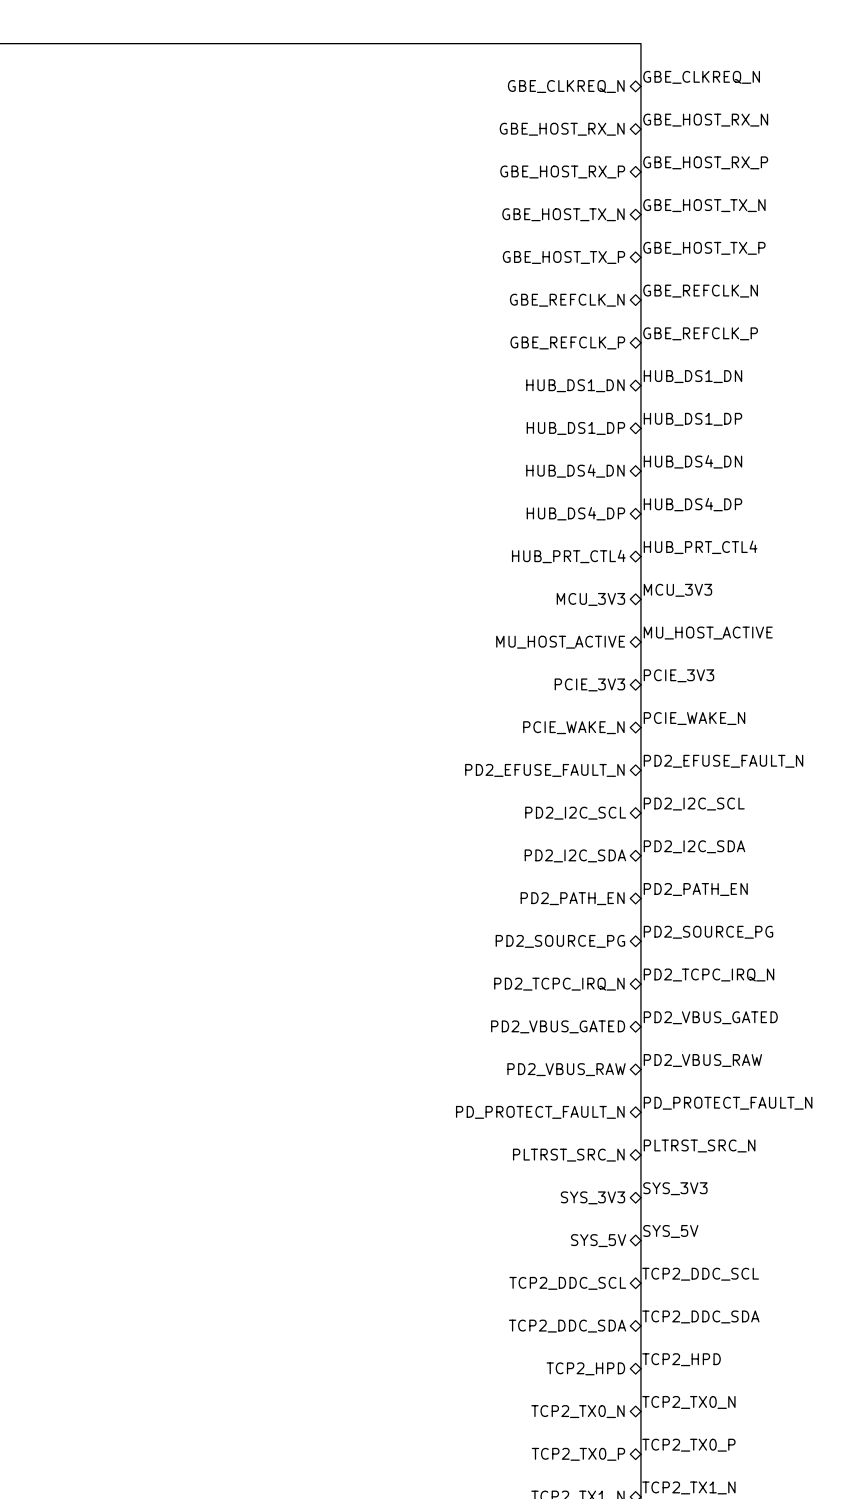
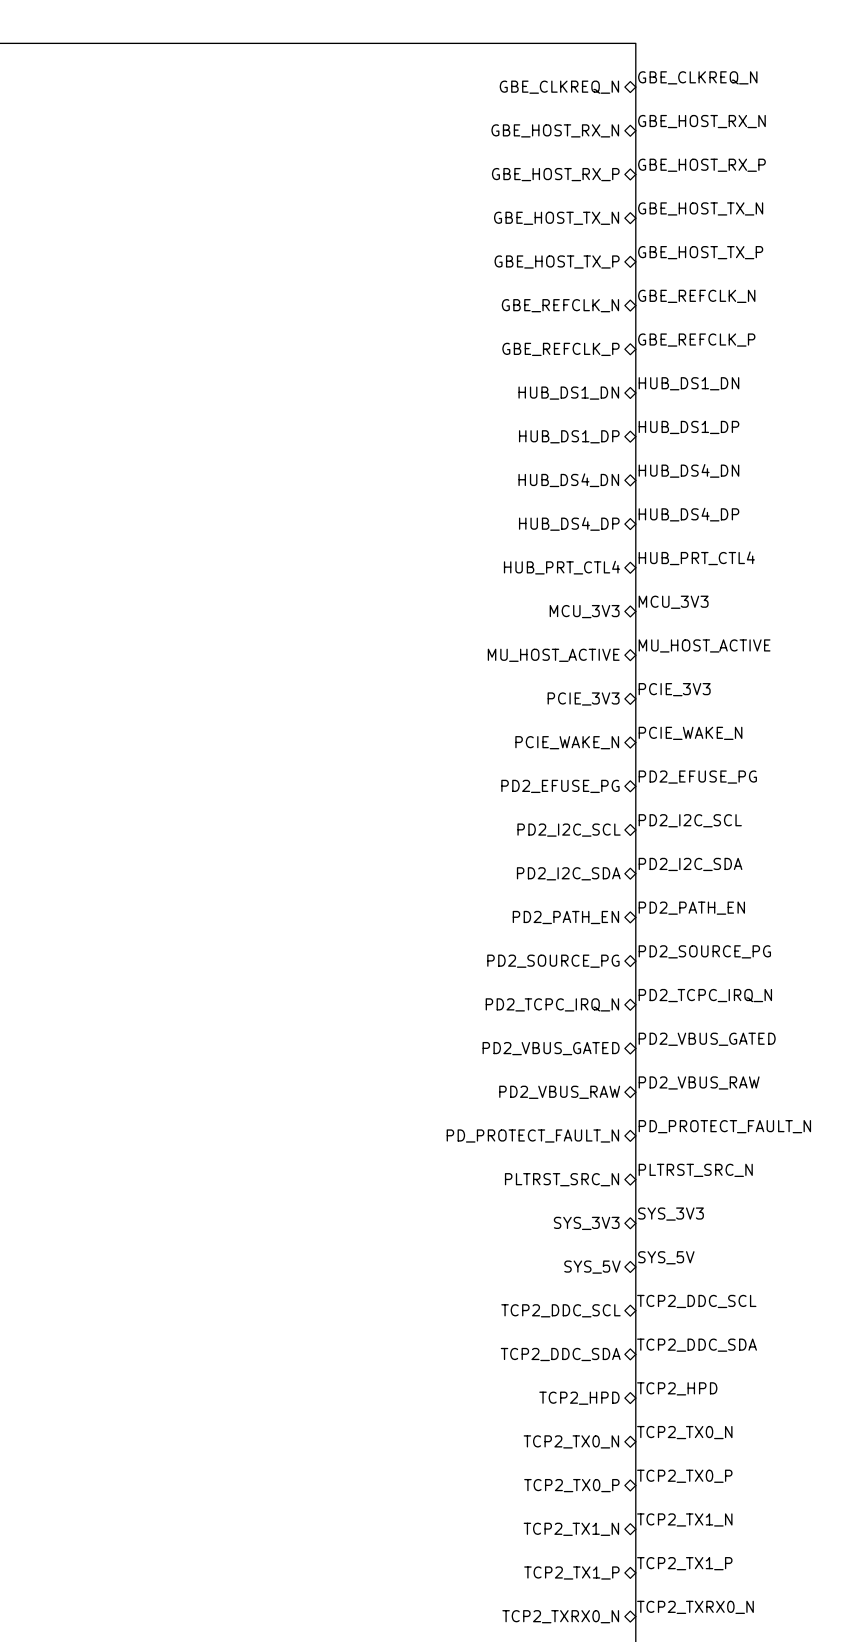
label: PD2_EFUSE_FAULT_N (723, 761) -> PD2_EFUSE_PG (697, 777)
sheet pin: PD2_EFUSE_FAULT_N (544, 770) -> PD2_EFUSE_PG (560, 786)

